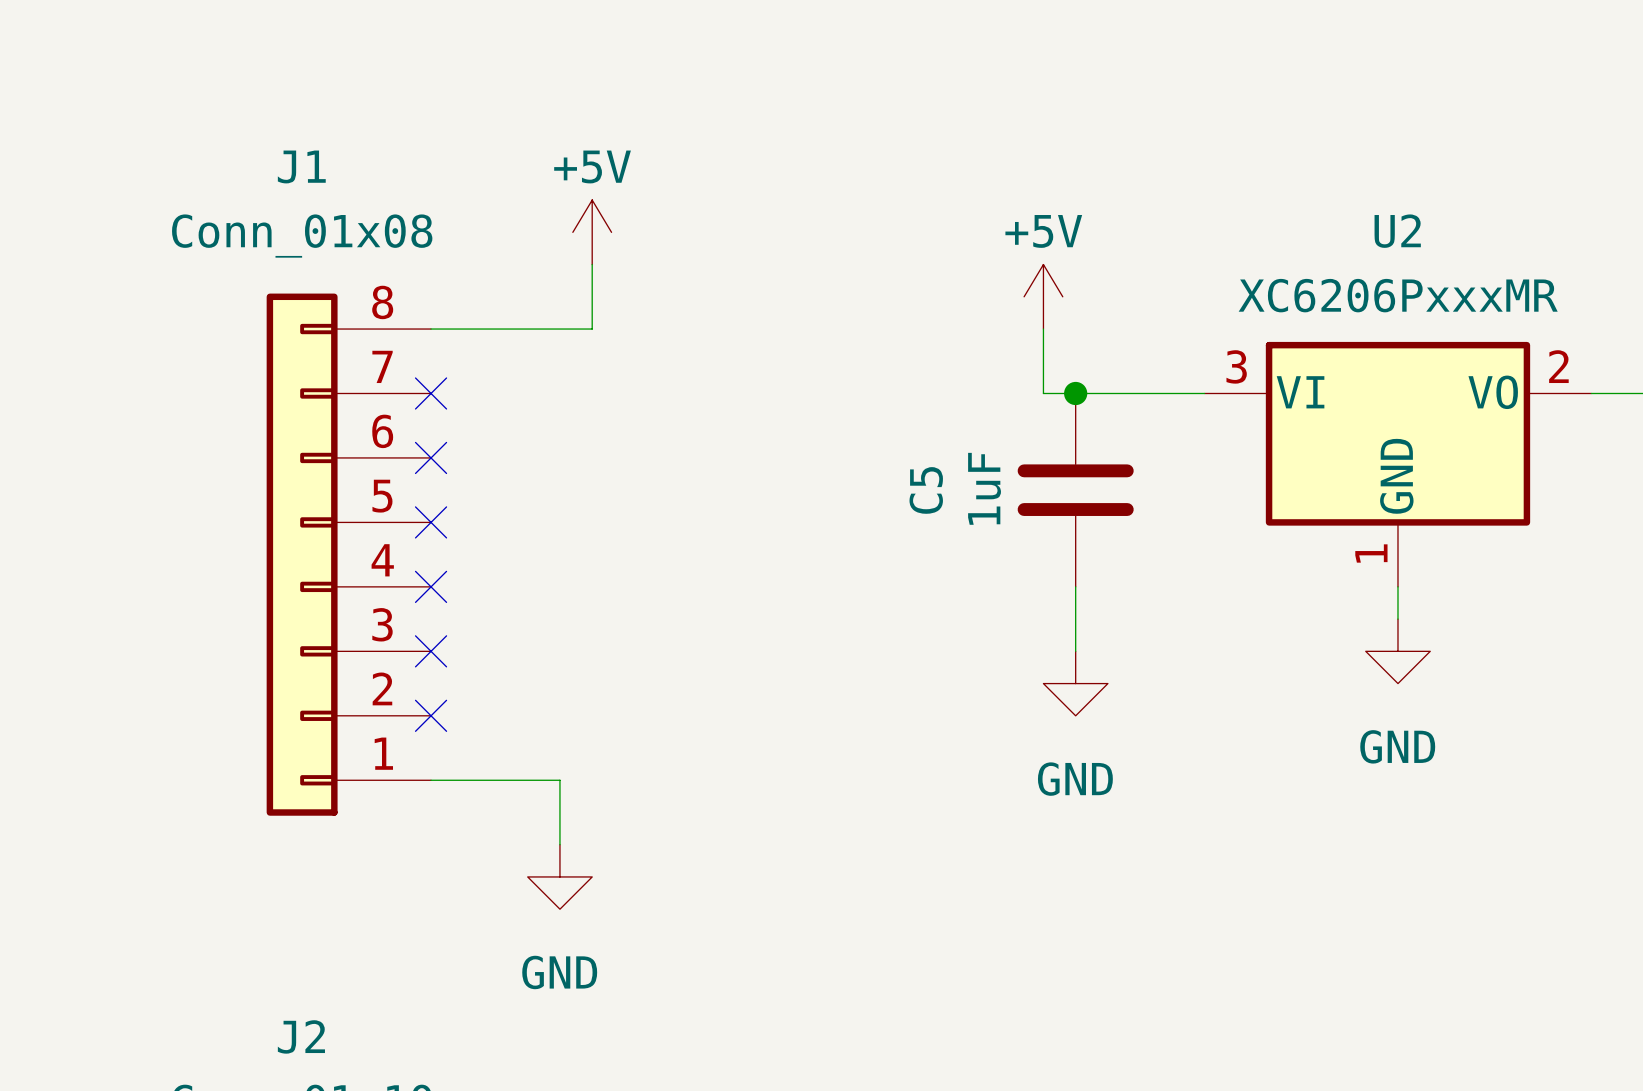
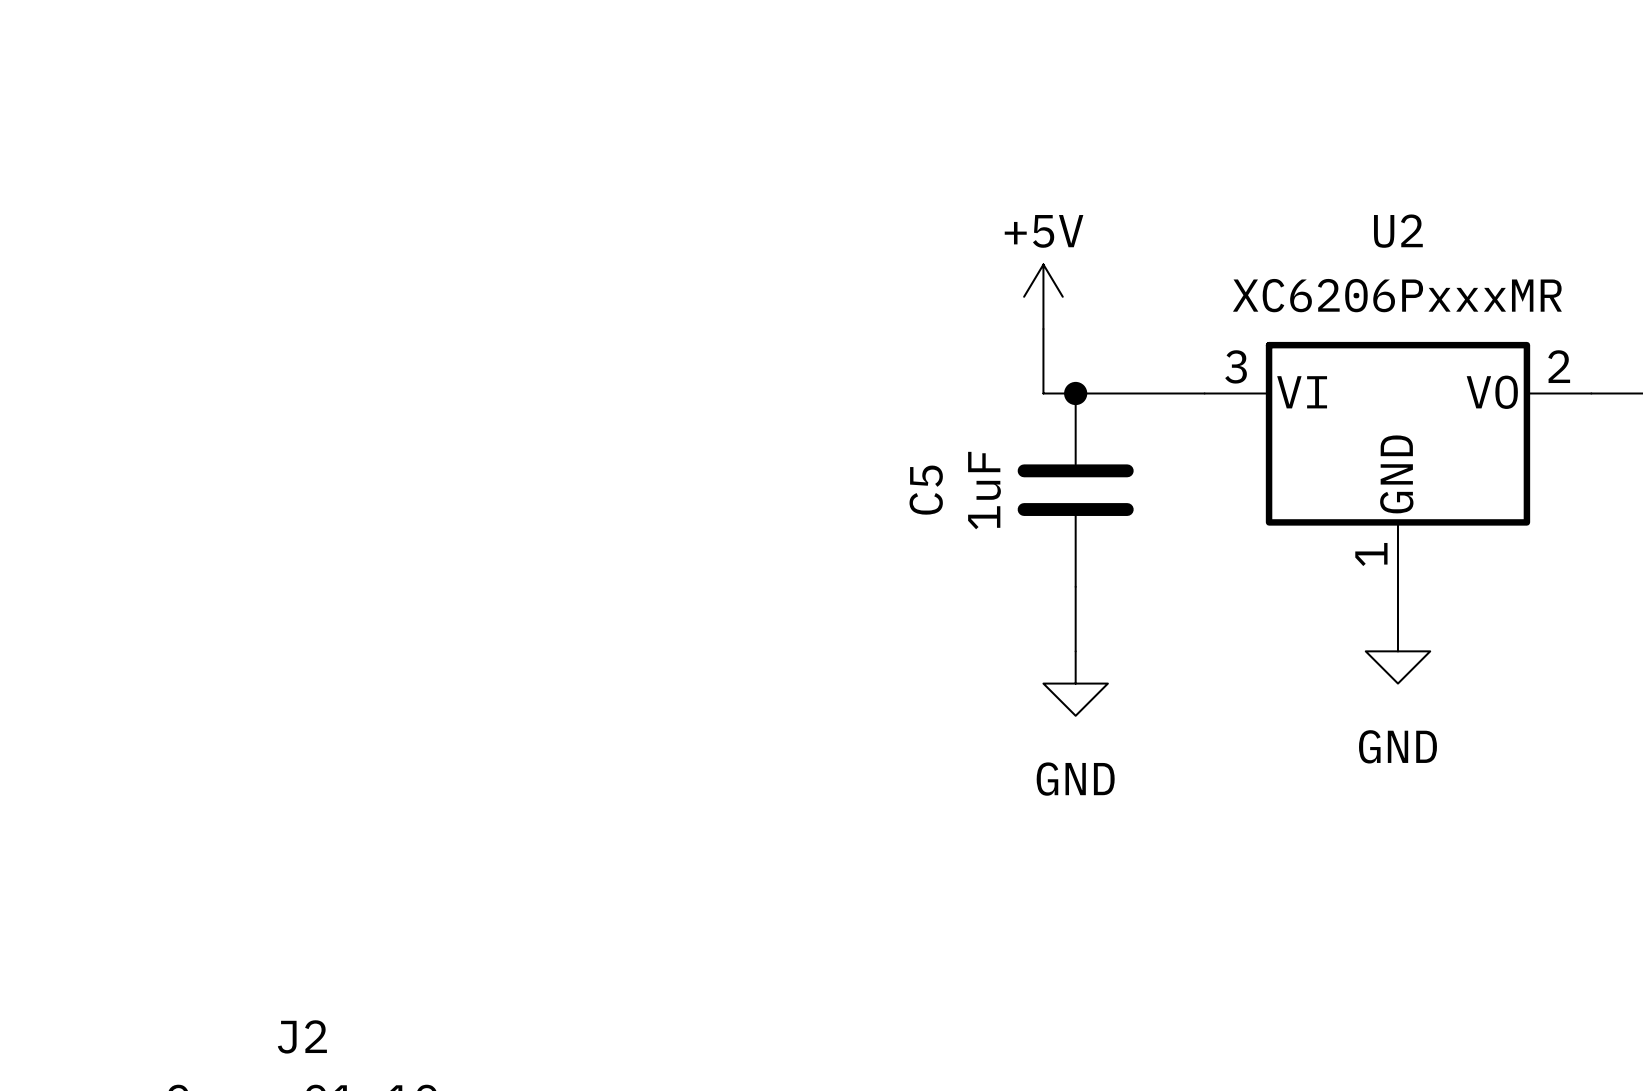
power symbol: +5V (592, 232) -> none
wire: (592, 264) (592, 329) (431, 329) -> none
no-connect mark: (431, 393) -> none
no-connect mark: (431, 457) -> none
no-connect mark: (431, 522) -> none
J1: Conn_01x08 (348, 554) -> none
no-connect mark: (431, 586) -> none
no-connect mark: (431, 651) -> none
no-connect mark: (431, 715) -> none
wire: (431, 780) (559, 780) (559, 844) -> none
power symbol: GND (559, 876) -> none

